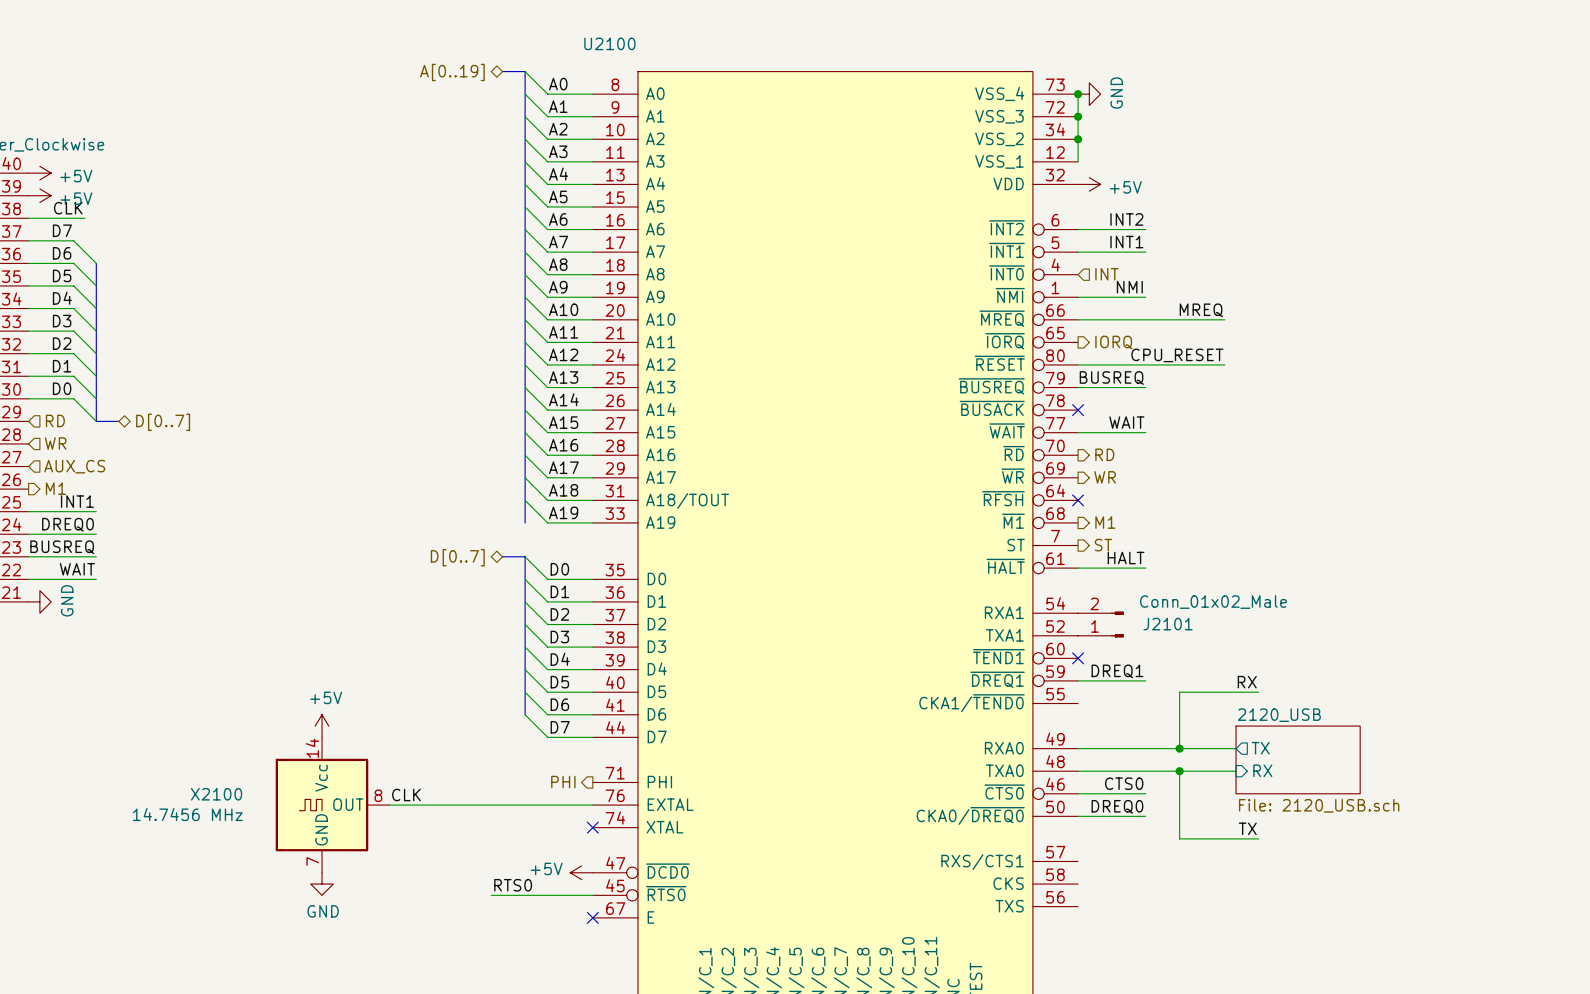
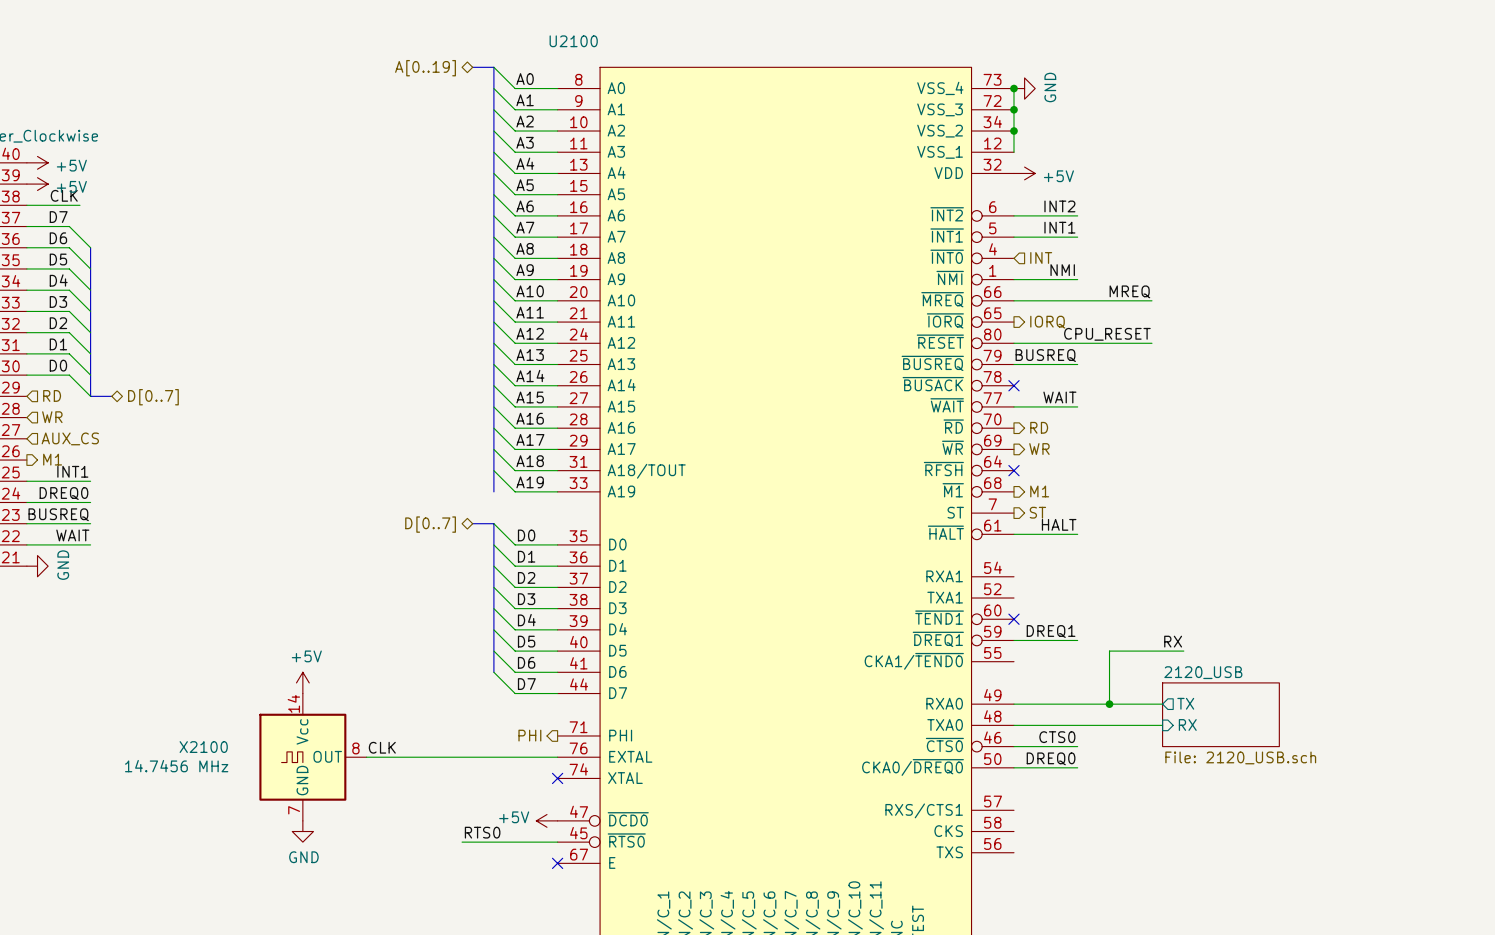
J2101: Conn_01x02_Male (1100, 624) -> none
wire: (1179, 771) (1179, 838) (1258, 838) -> none
junction: (1179, 771) -> none
label: TX (1247, 828) -> none

